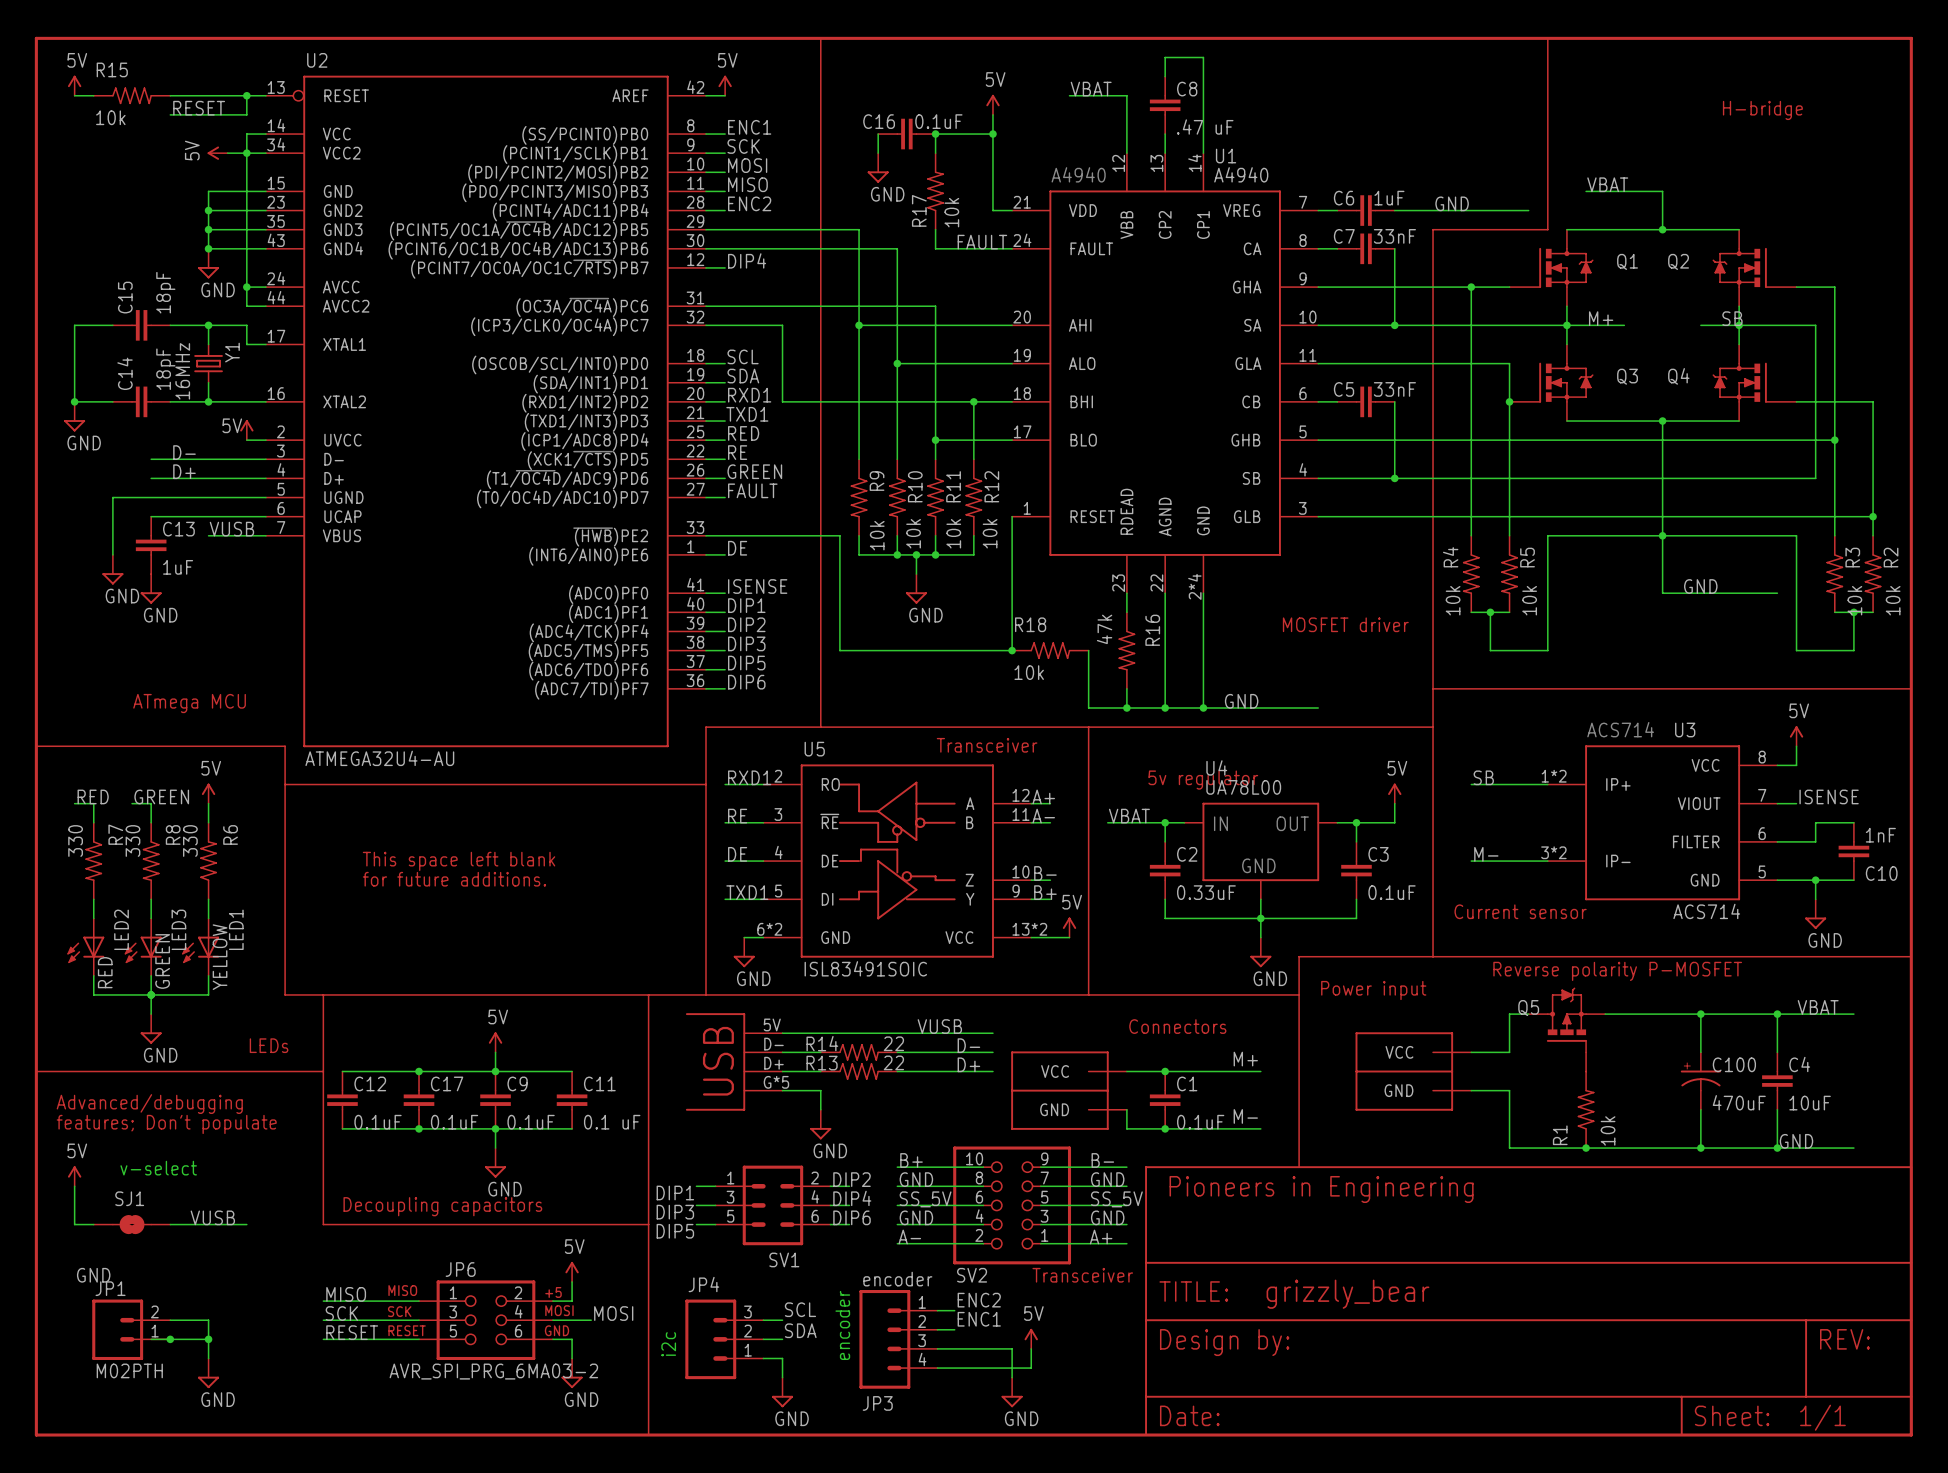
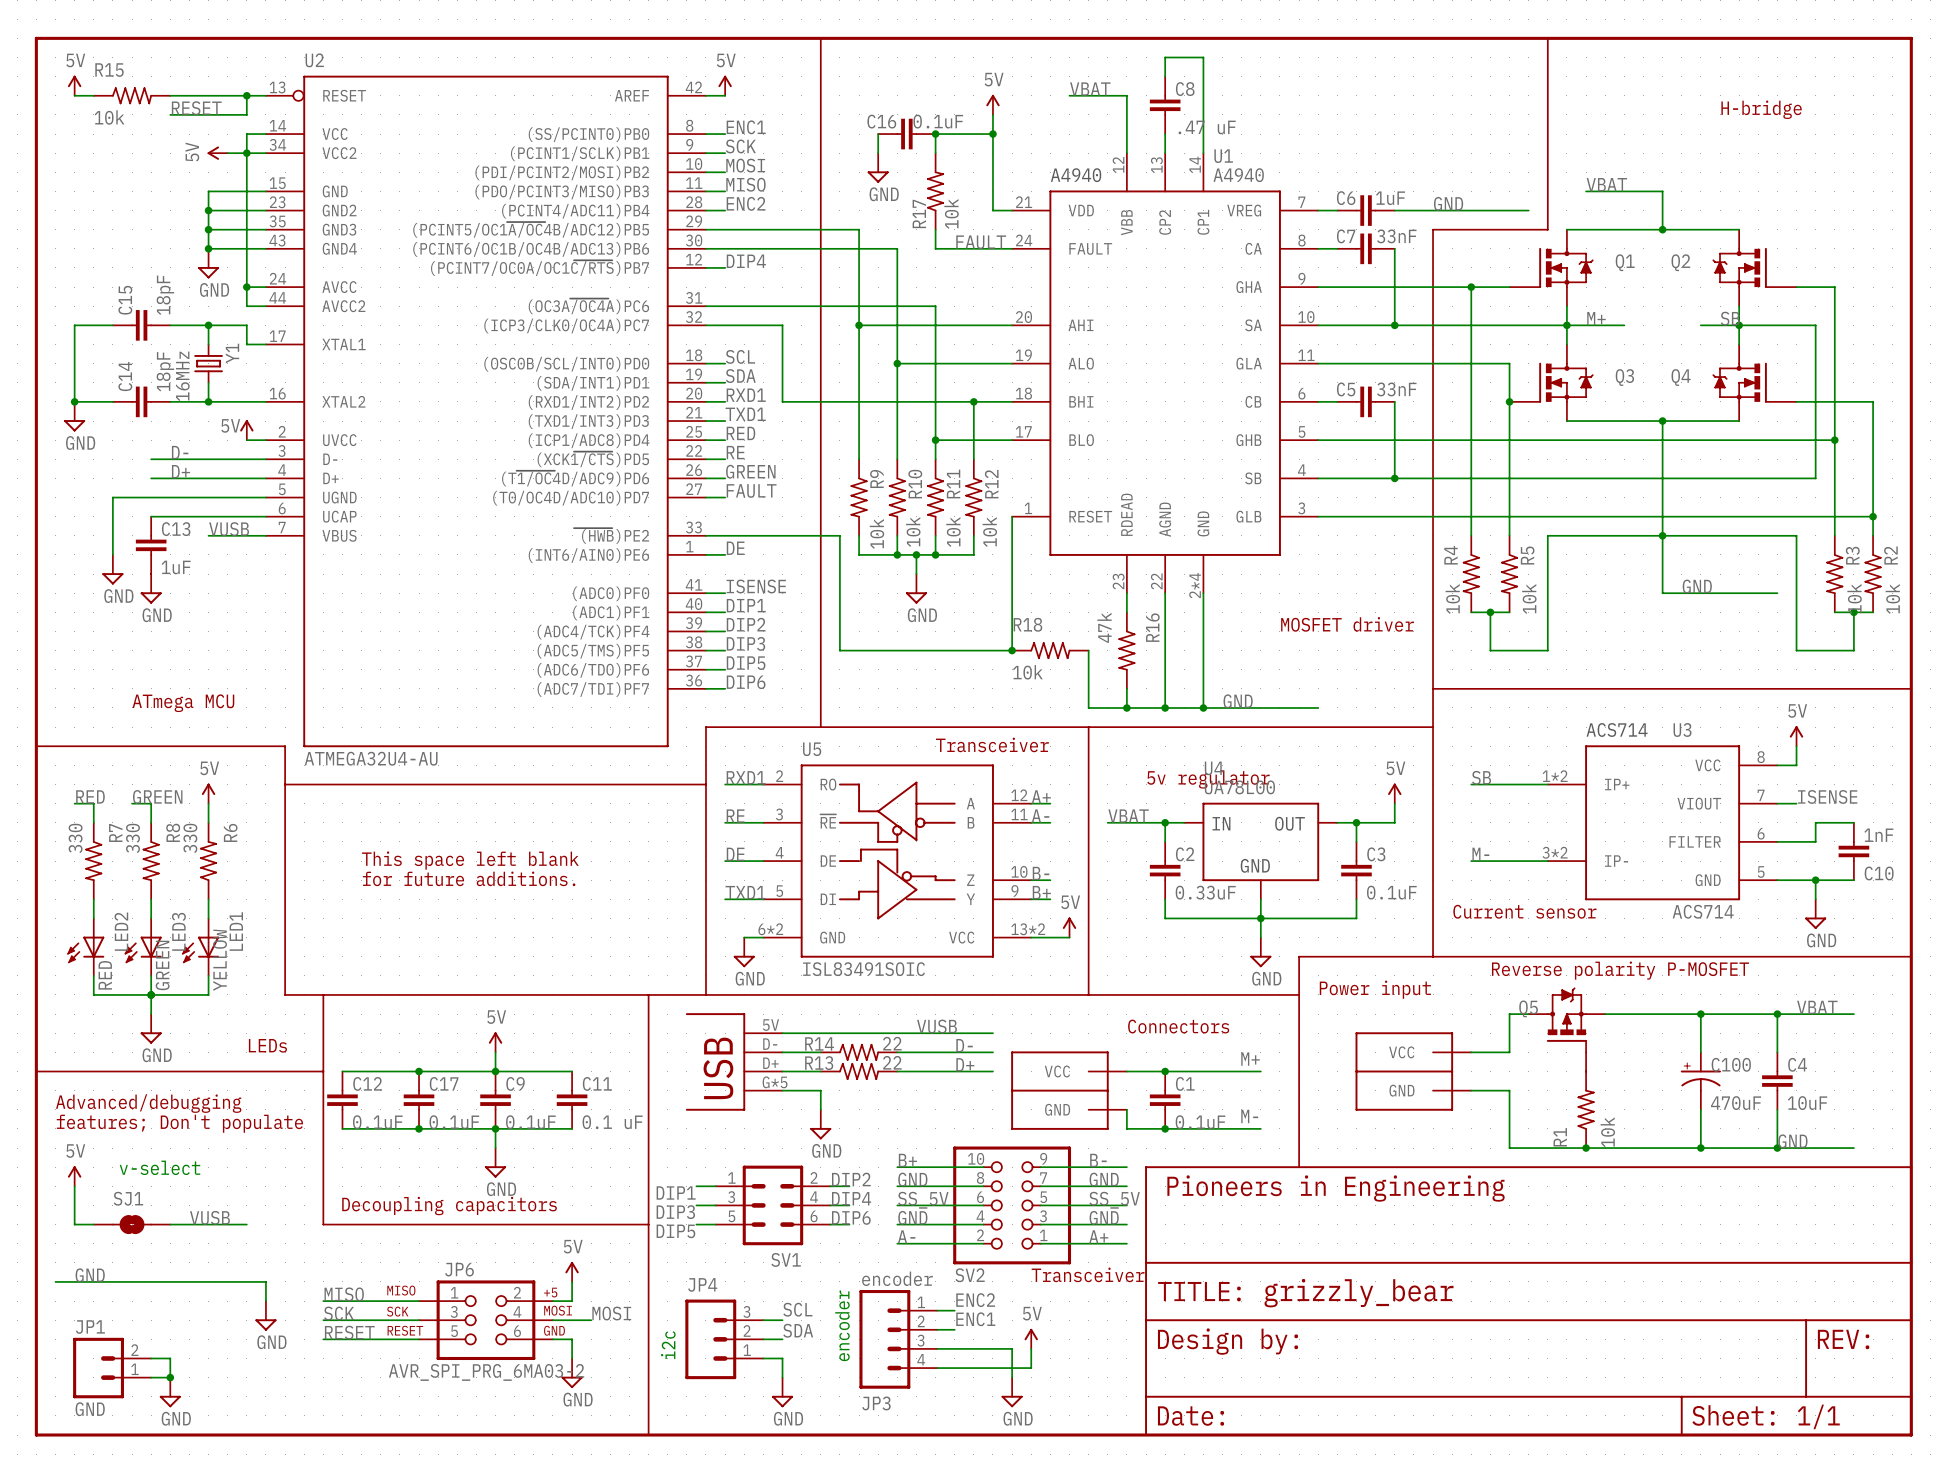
wire: none -> (55, 1281) (265, 1281) (265, 1301)
power symbol: none -> GND (265, 1315)
wire: (170, 1320) (208, 1320) (208, 1358) -> none
JP1 position: (131, 1329) -> (112, 1368)
wire: (151, 1339) (208, 1339) -> none
junction: (170, 1339) -> none
junction: (208, 1339) -> none
wire: none -> (151, 1358) (170, 1358) (170, 1377) (151, 1377)
JP1 value: M02PTH (129, 1370) -> GND (90, 1409)
power symbol: GND (208, 1373) -> none
junction: none -> (170, 1377)
power symbol: none -> GND (170, 1392)

